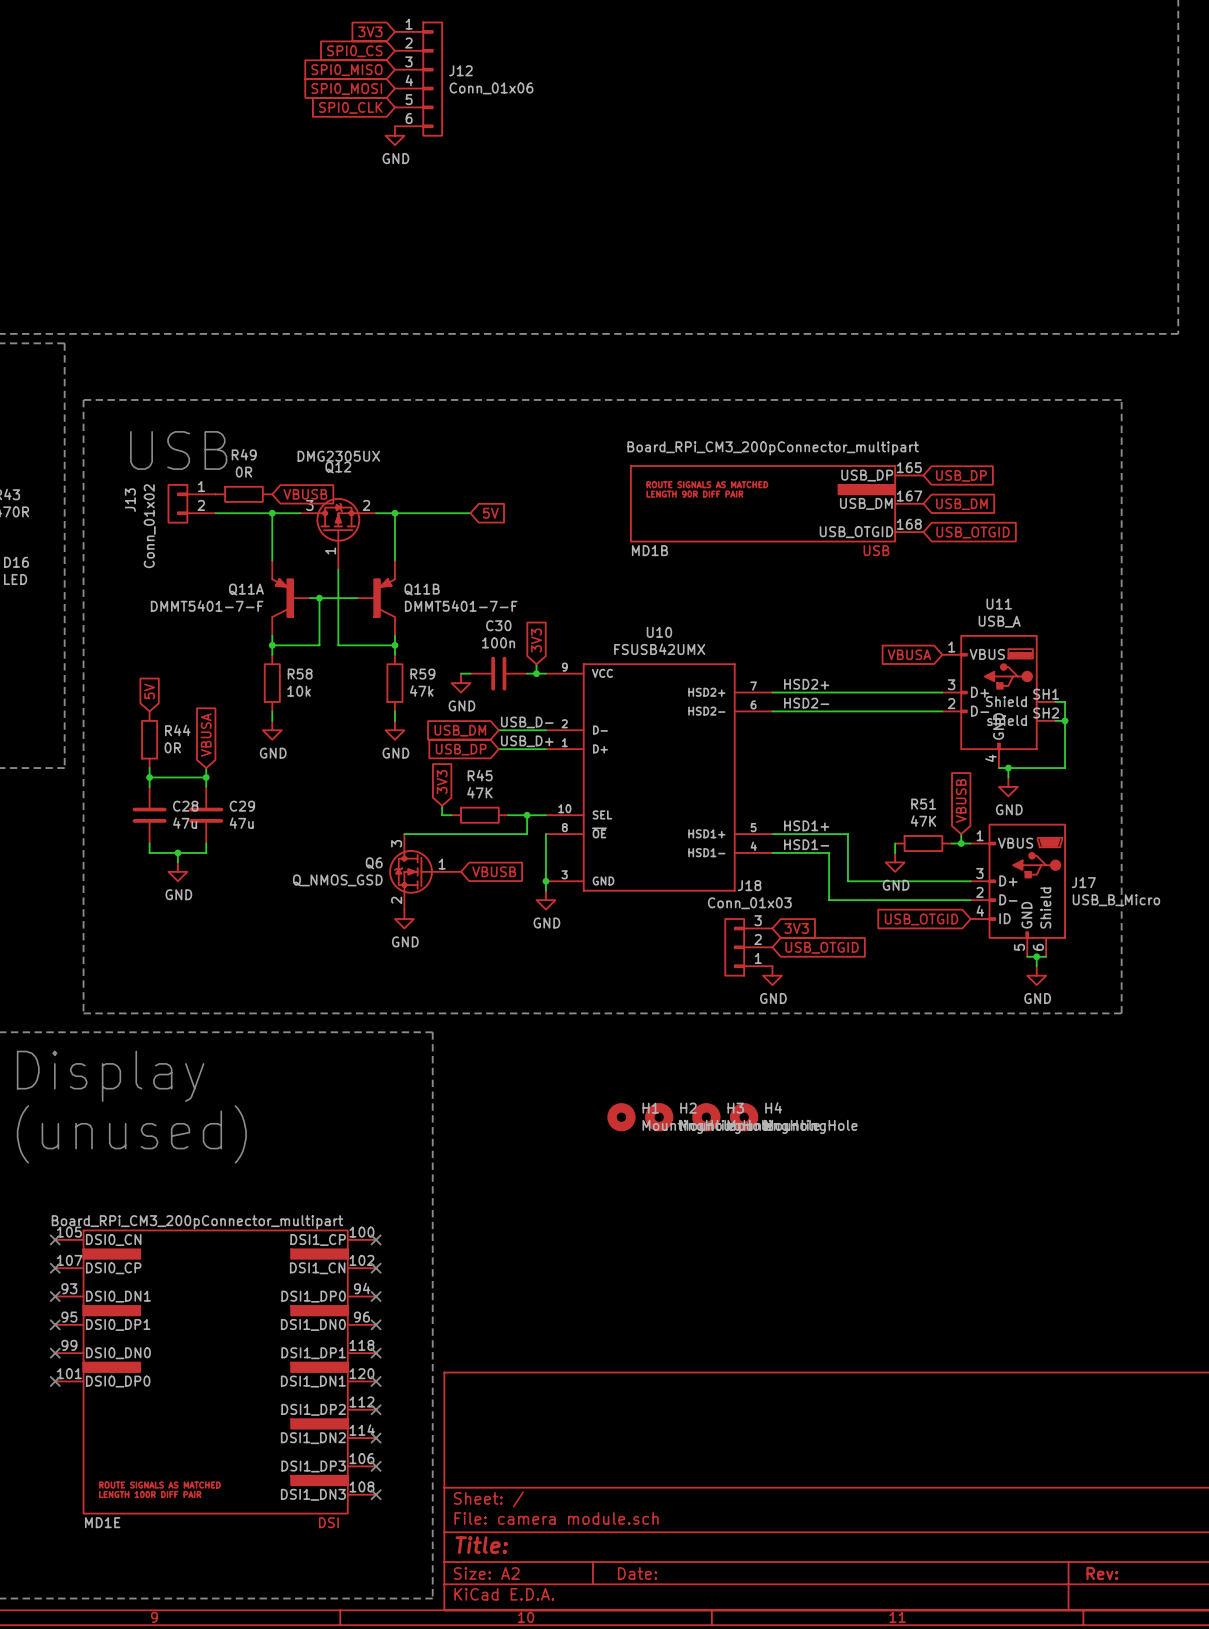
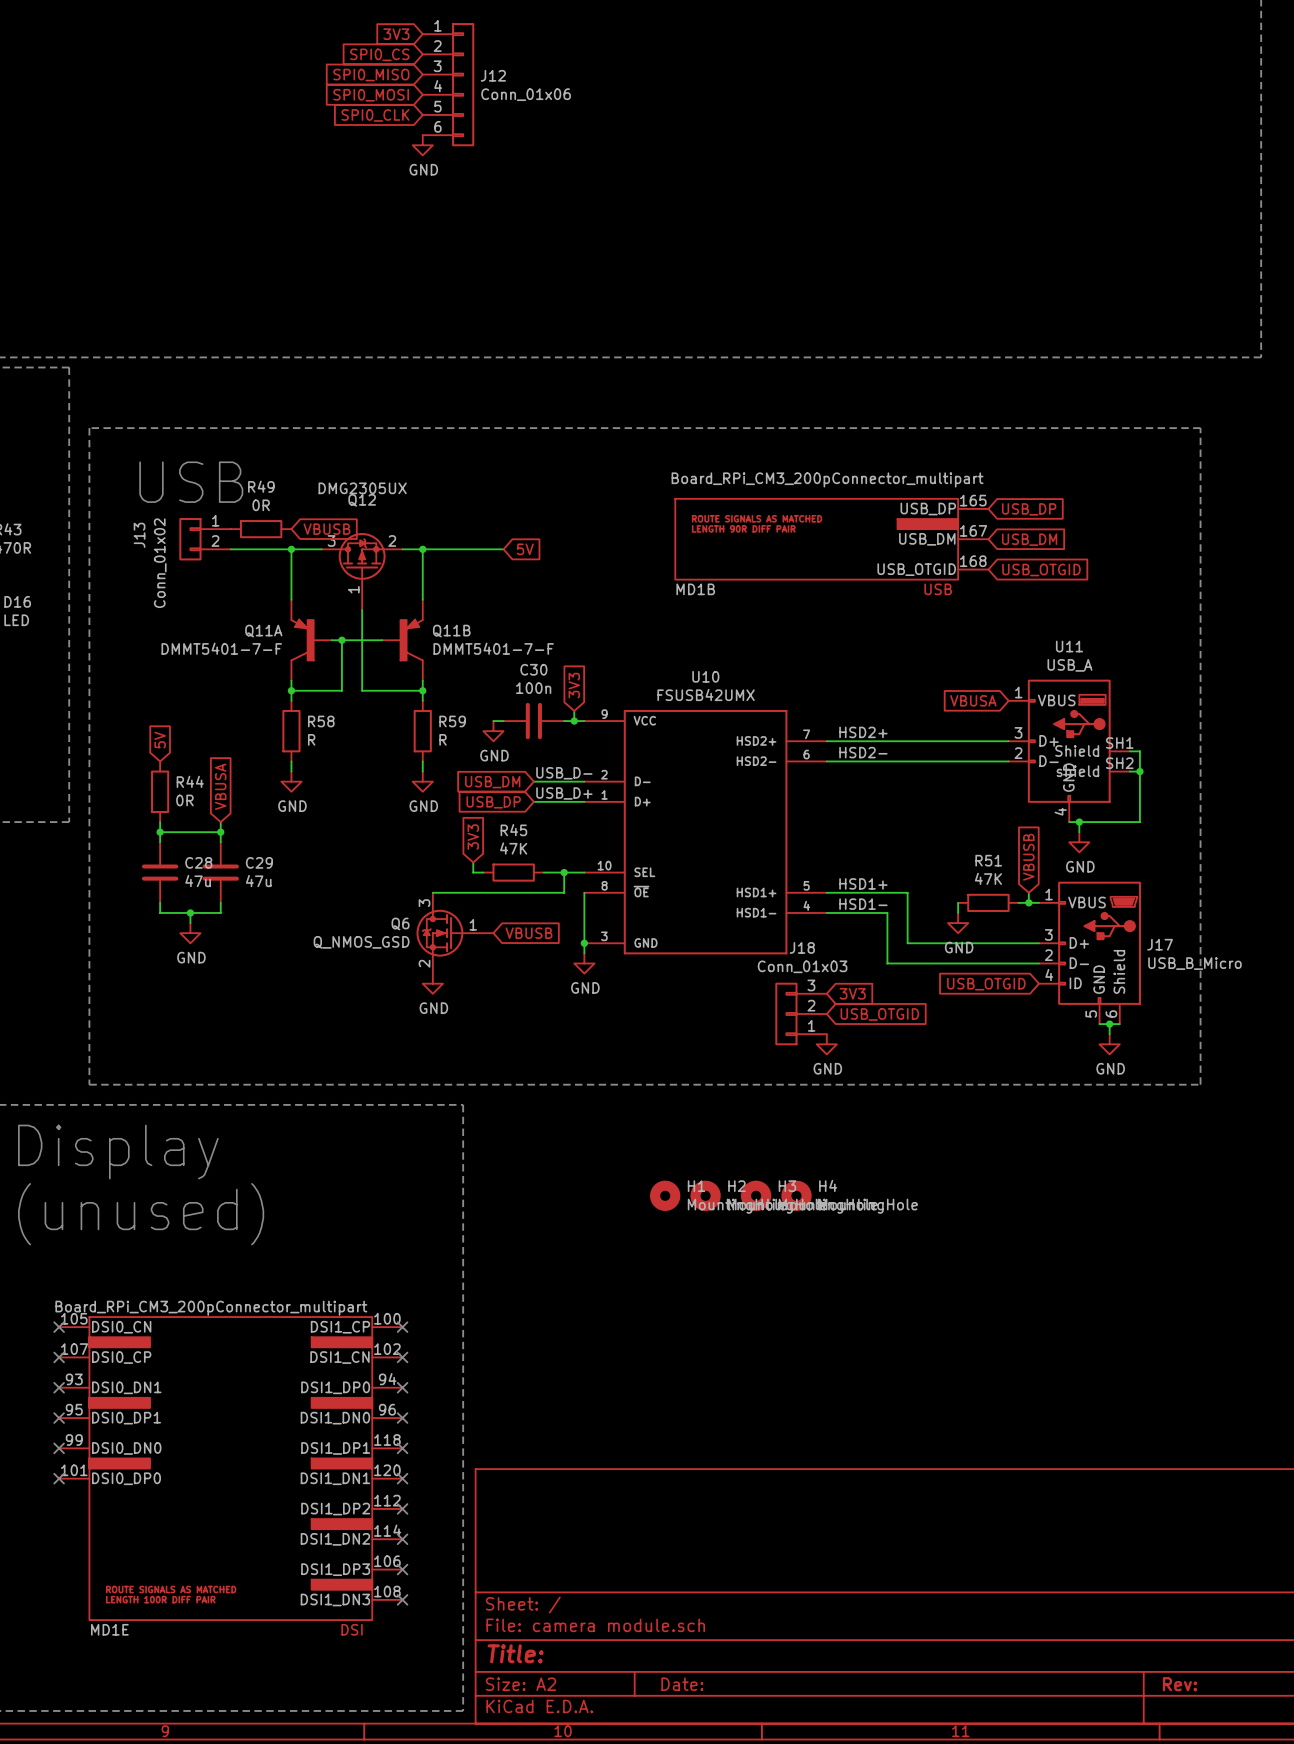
R58 value: 10k (299, 691) -> R (311, 739)
R59 value: 47k (421, 691) -> R (442, 739)

